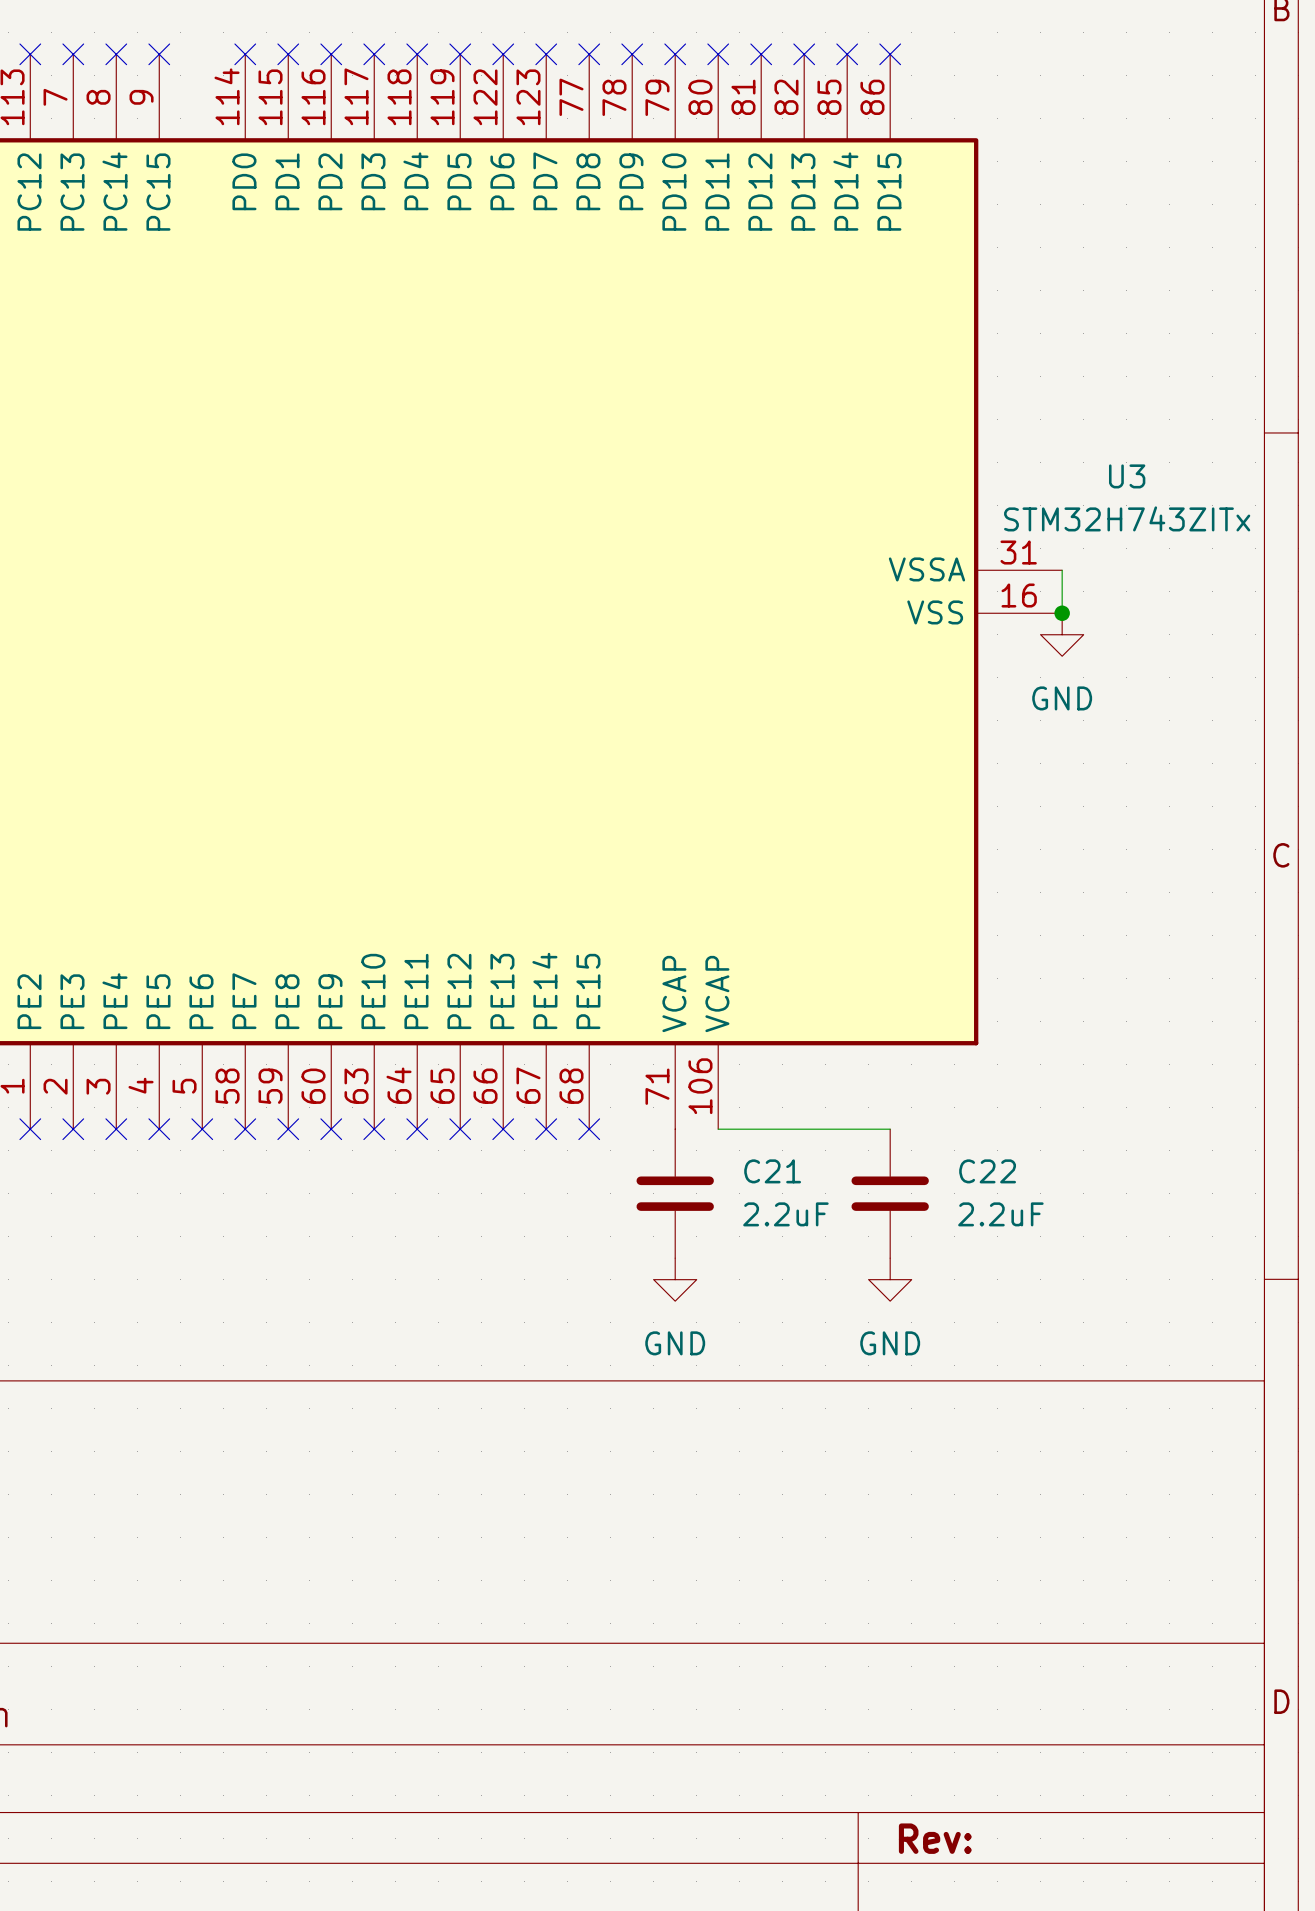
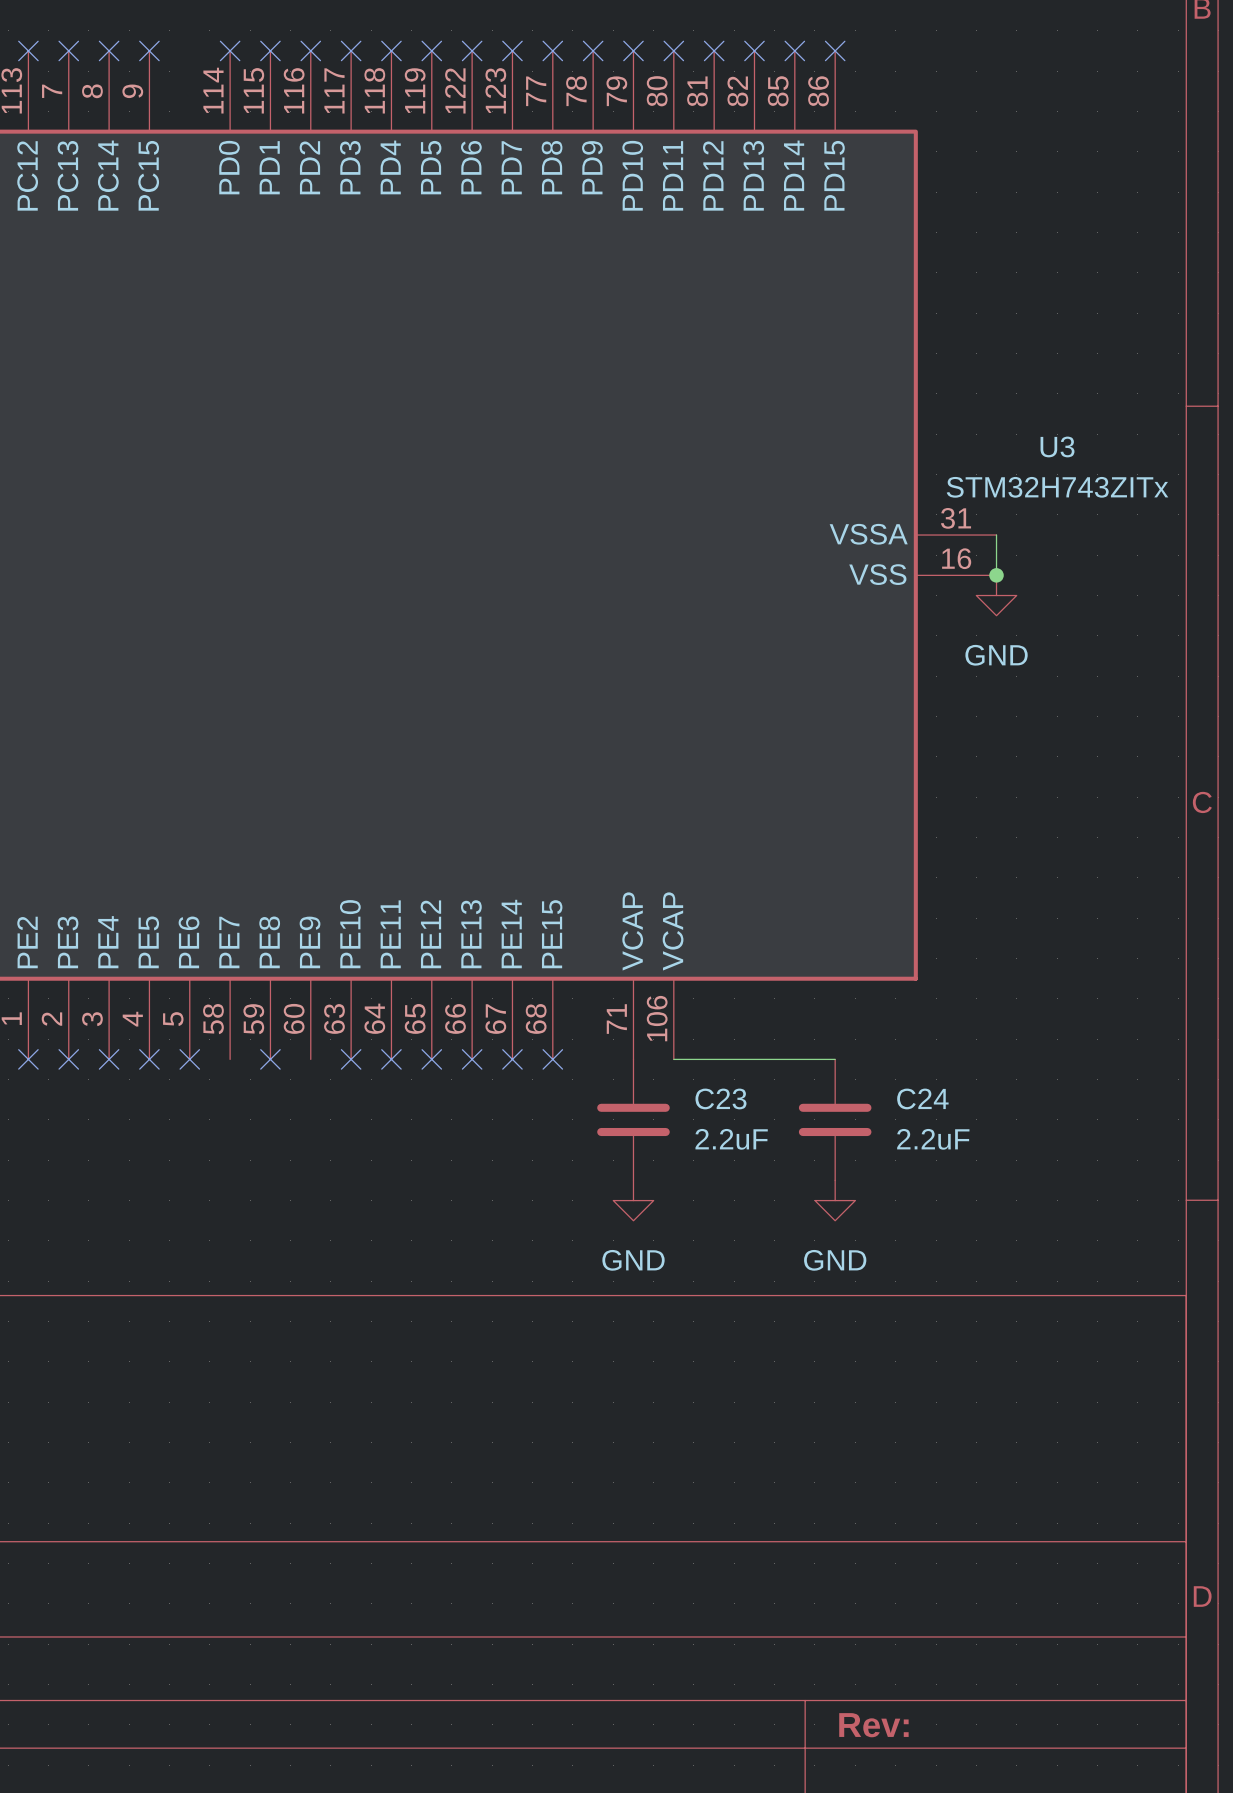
no-connect mark: (245, 1129) -> none
no-connect mark: (331, 1129) -> none
C21 name: C21 (772, 1171) -> C23 (720, 1098)
C22 name: C22 (987, 1171) -> C24 (922, 1098)

